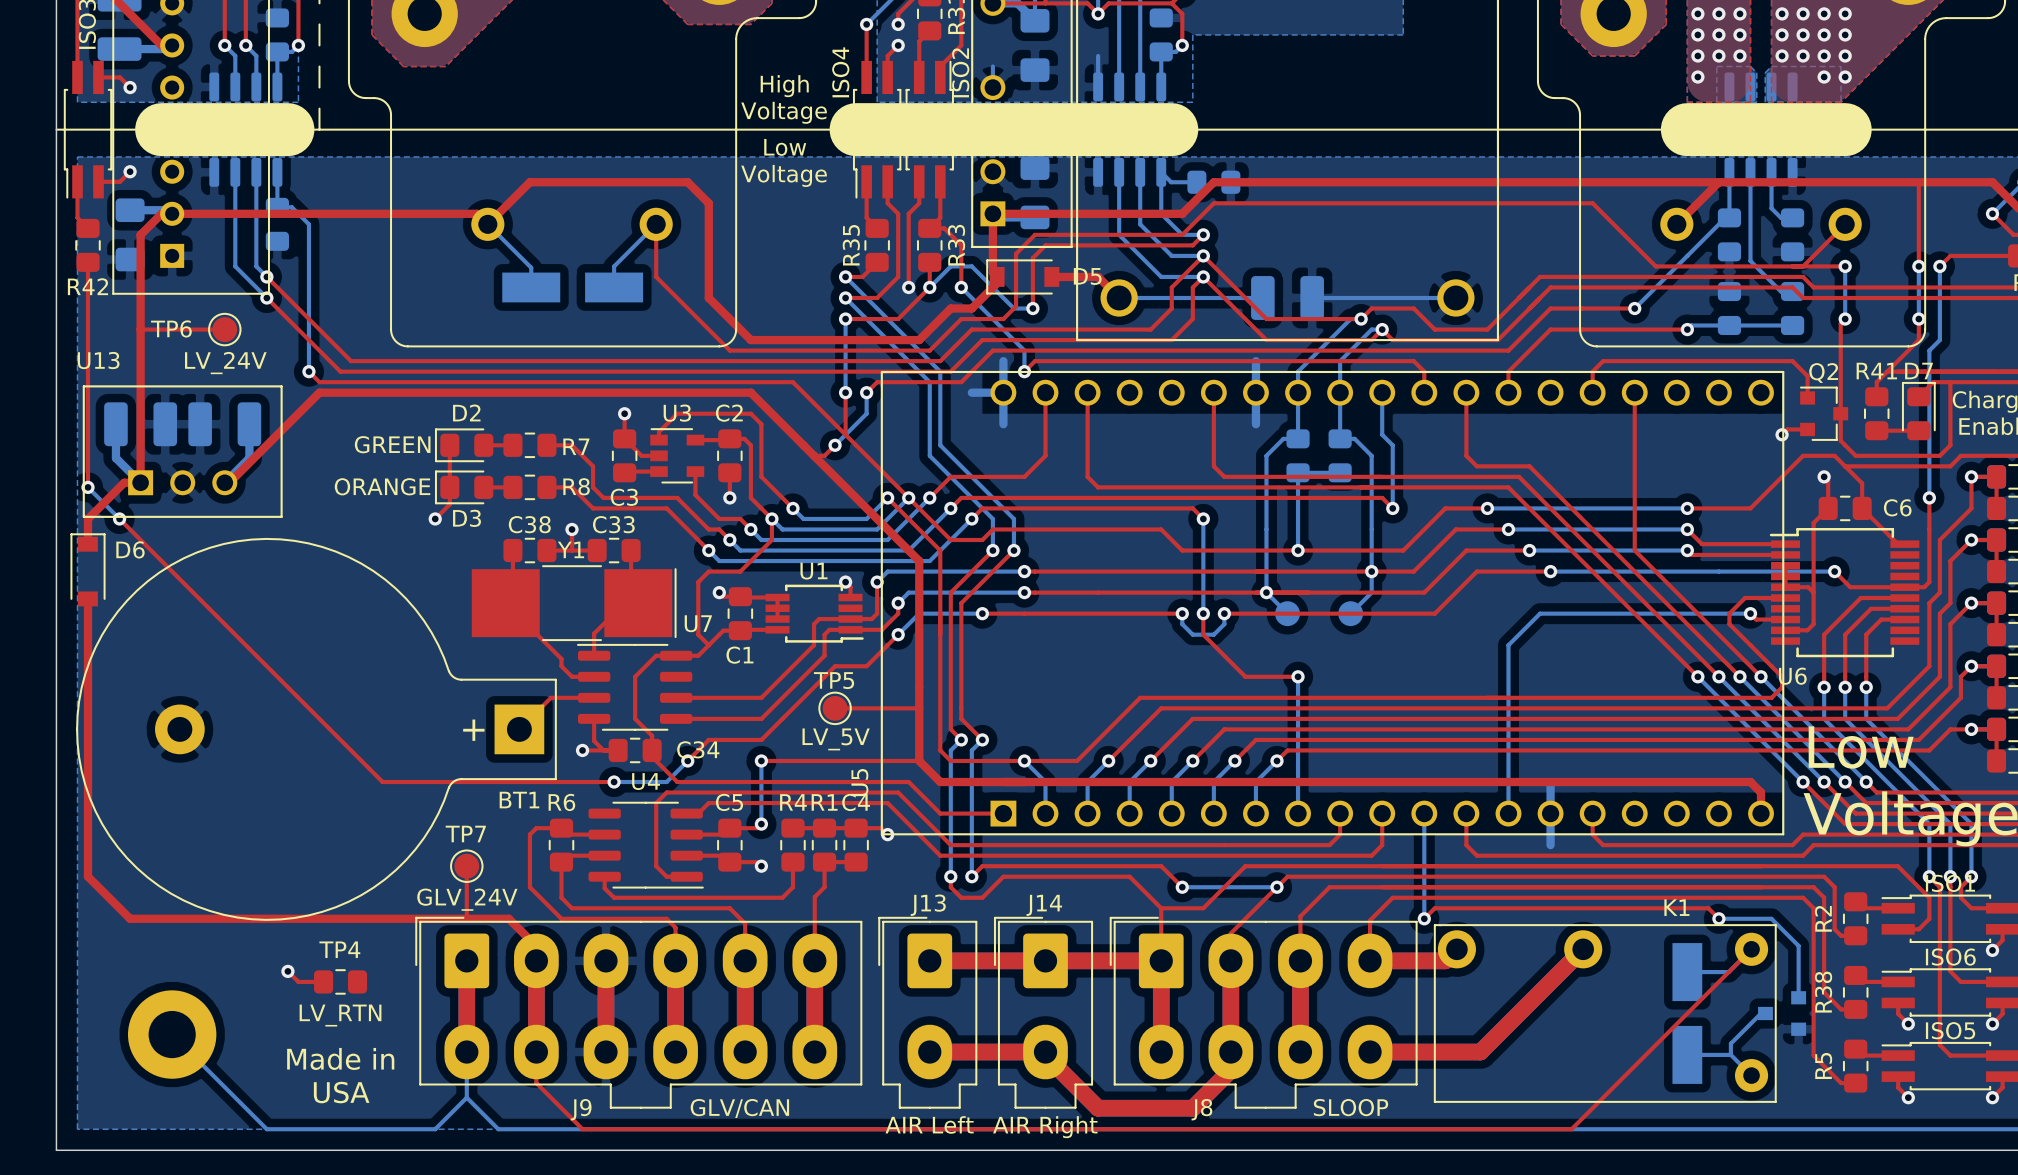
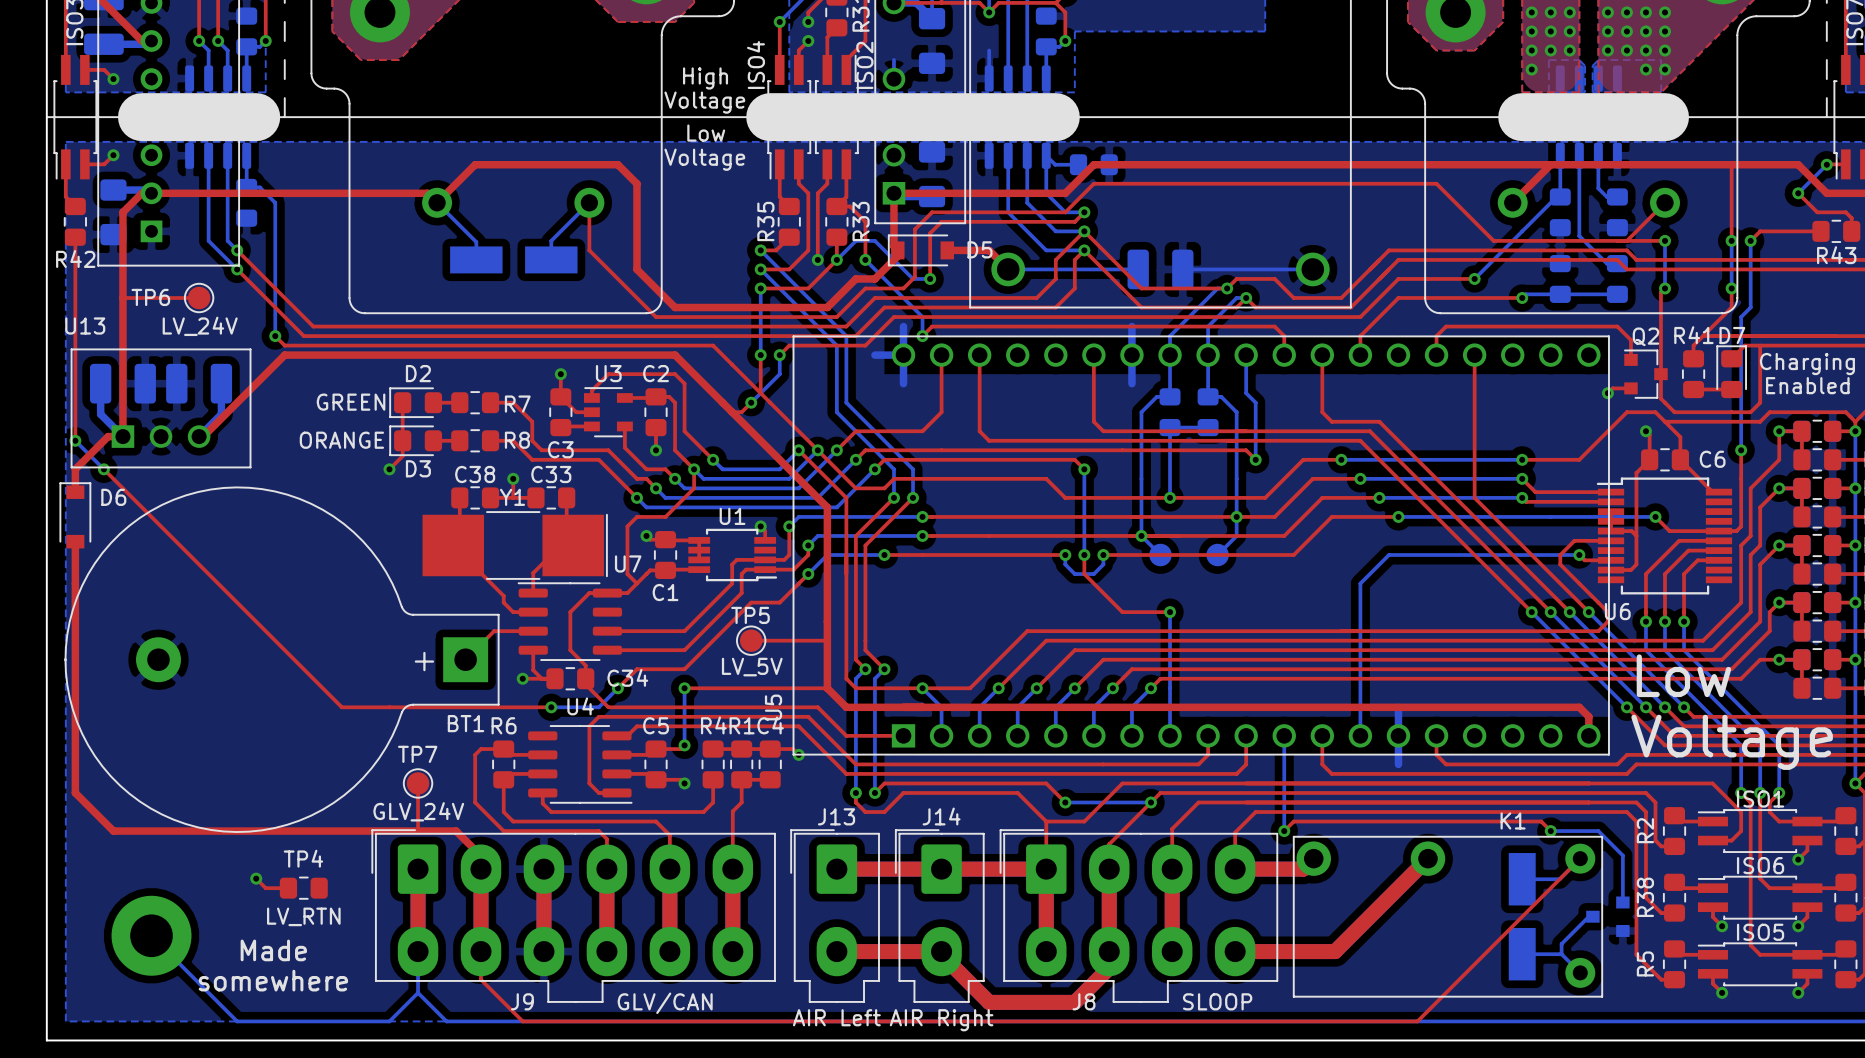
text: Made in (340, 1058) -> Made (273, 950)
text: none -> somewhere (273, 980)
text: USA (341, 1092) -> none

